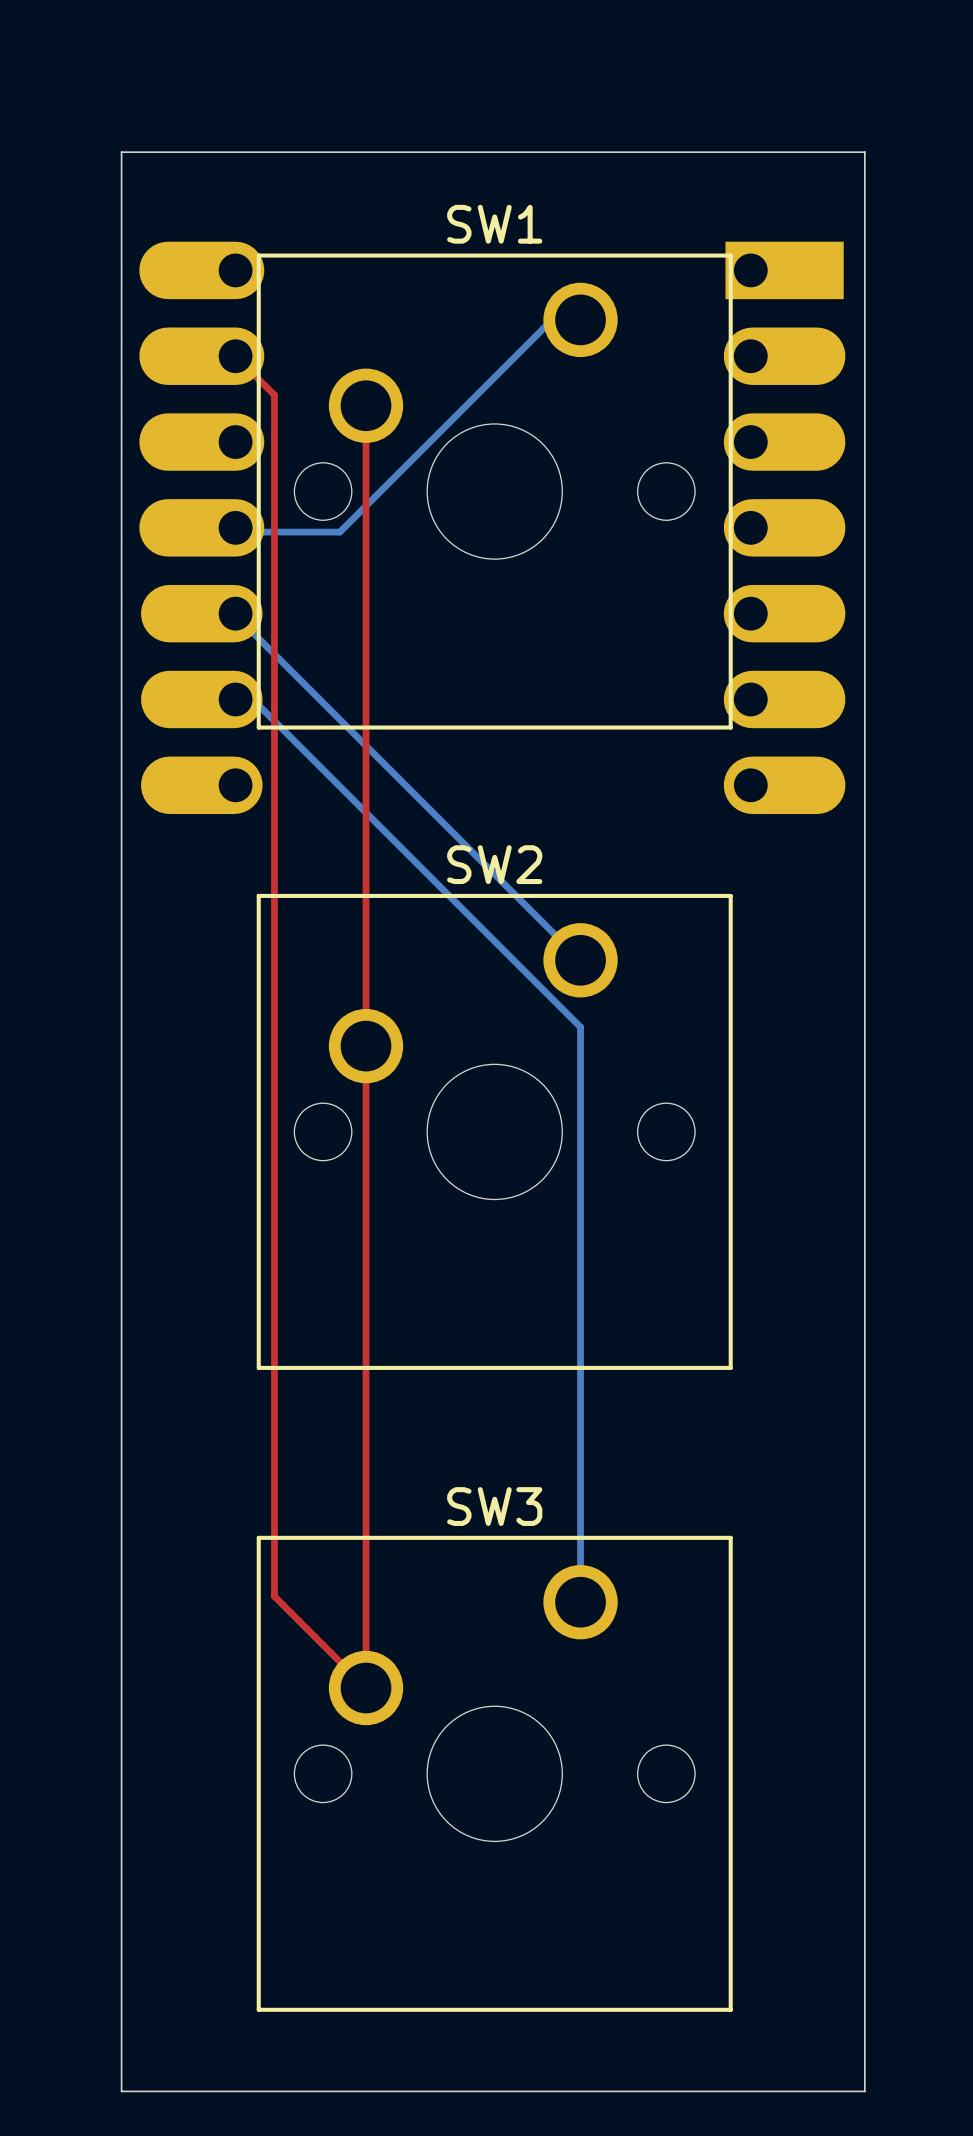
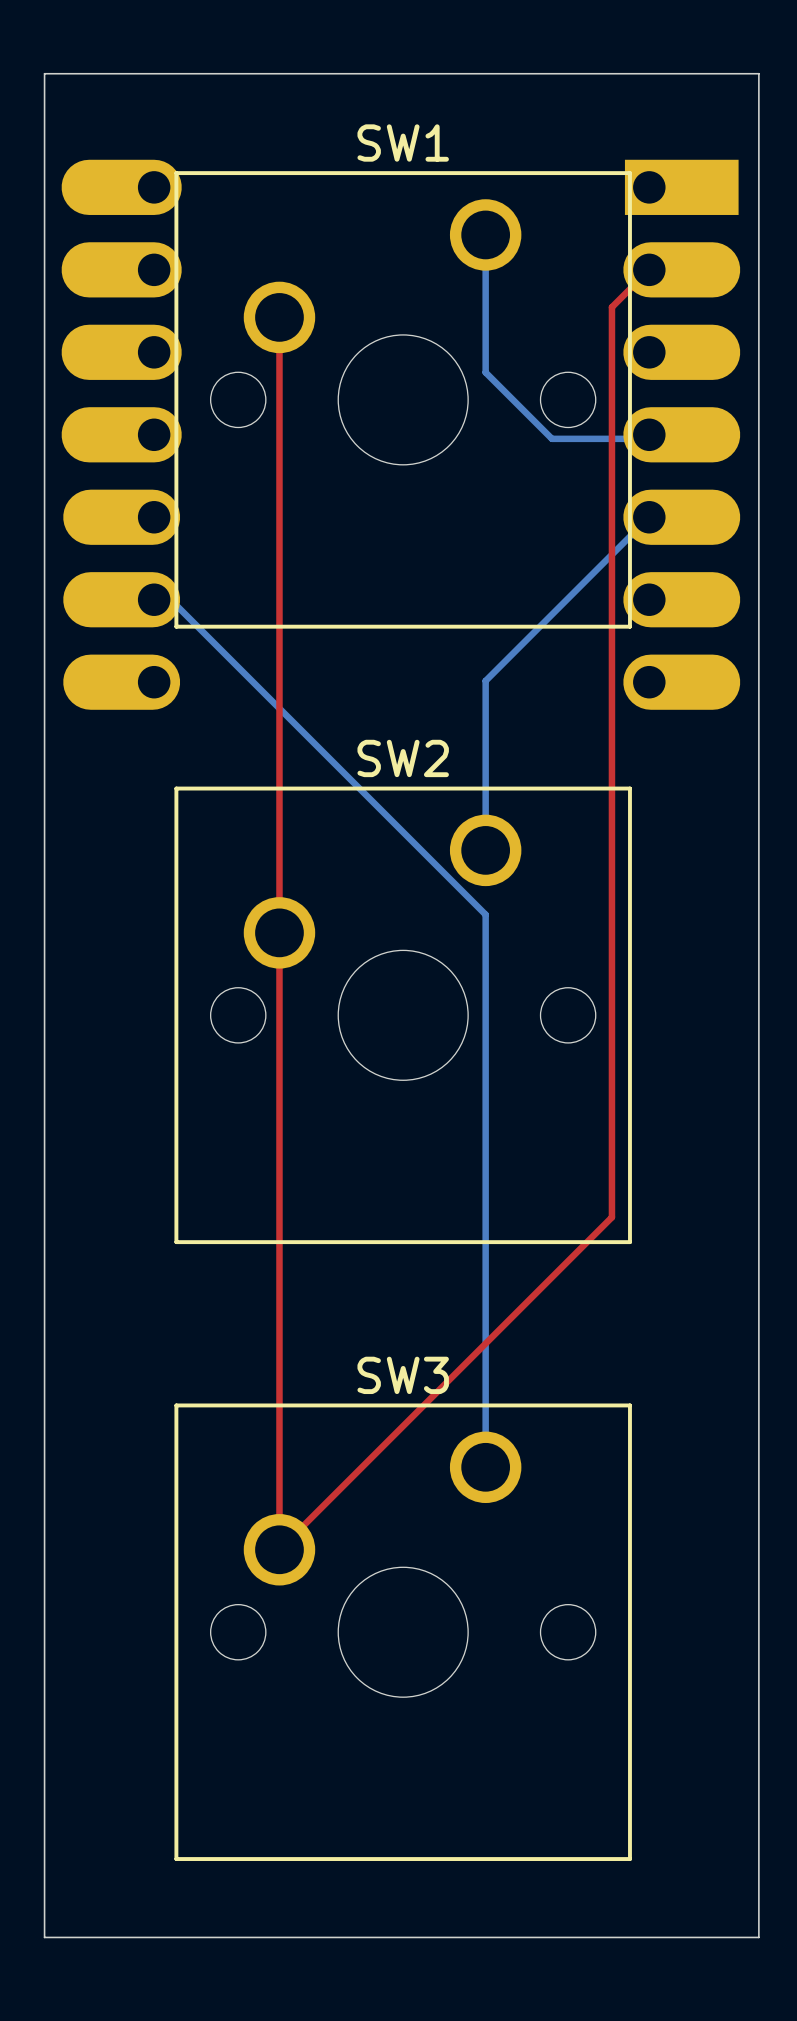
bottom track: (580, 319) (552, 319) (339, 532) (239, 532) (235, 527) -> (485, 234) (485, 372) (551, 438) (645, 438)
top track: (235, 356) (274, 395) (274, 1596) (366, 1688) (373, 1688) (366, 1680) -> (649, 269) (611, 307) (611, 1217) (279, 1549) (279, 1542)
bottom track: (235, 613) (580, 960) -> (649, 517) (485, 680) (485, 850)

